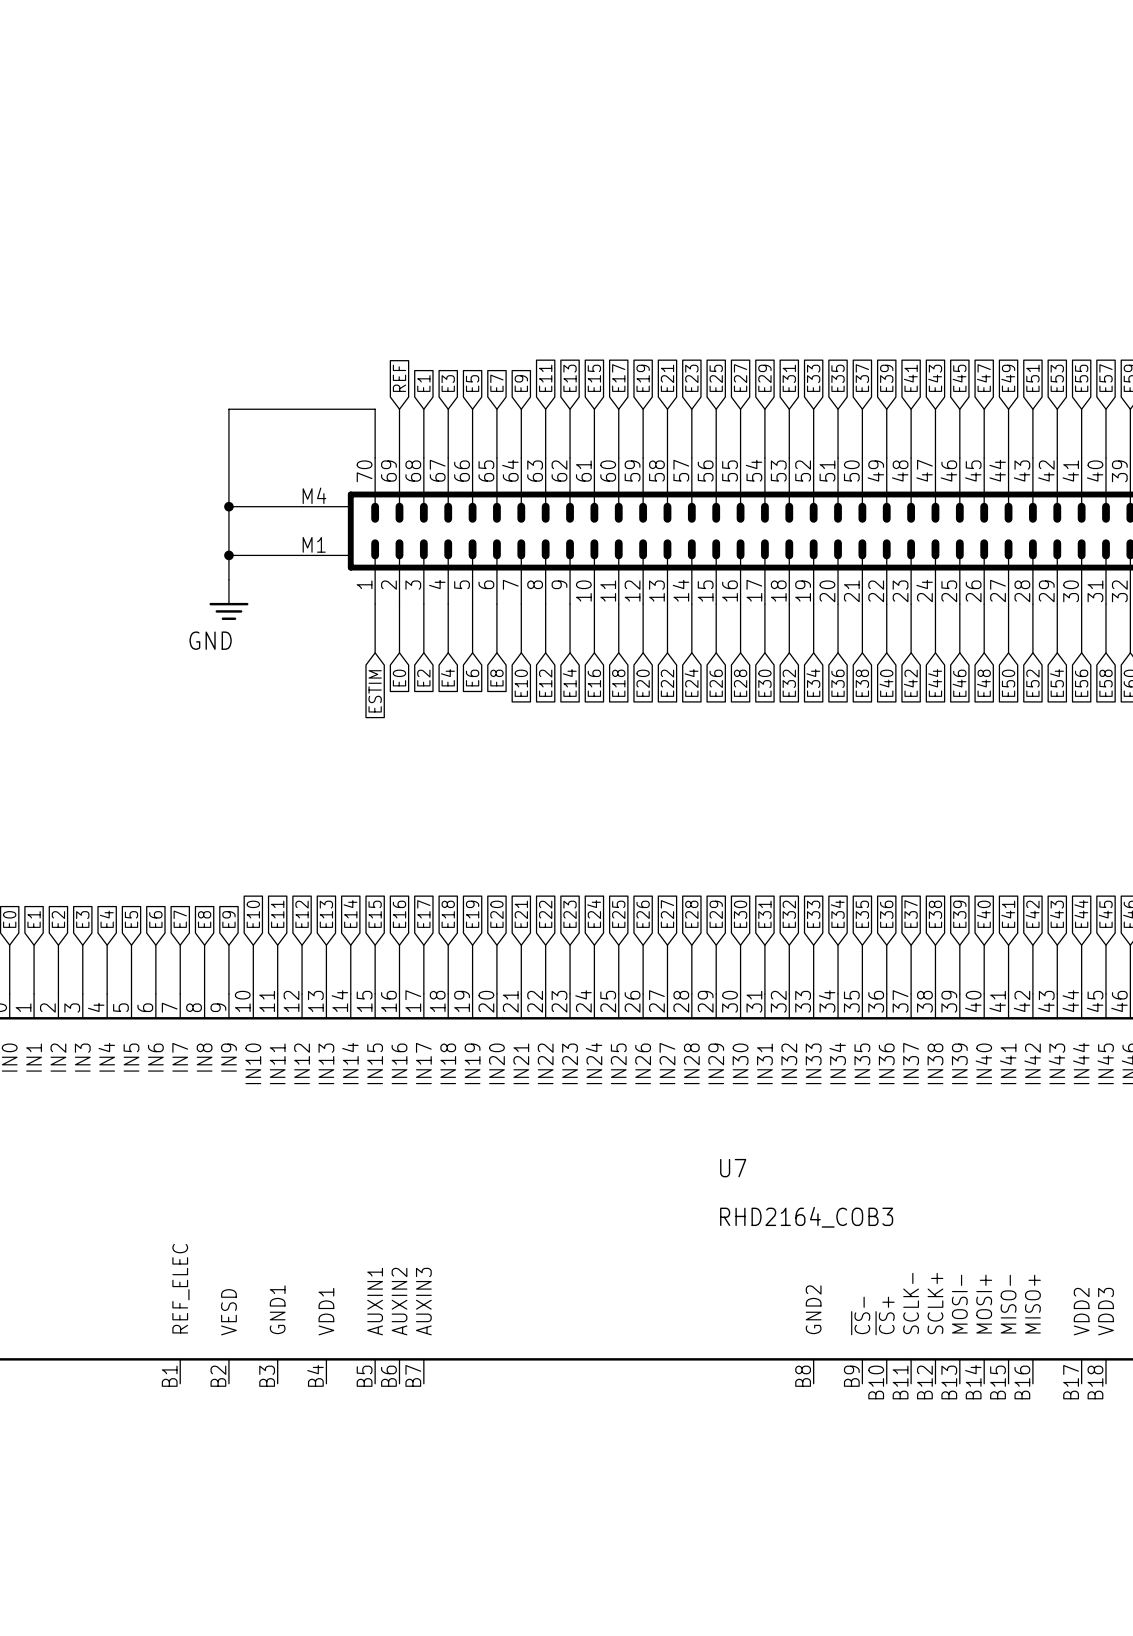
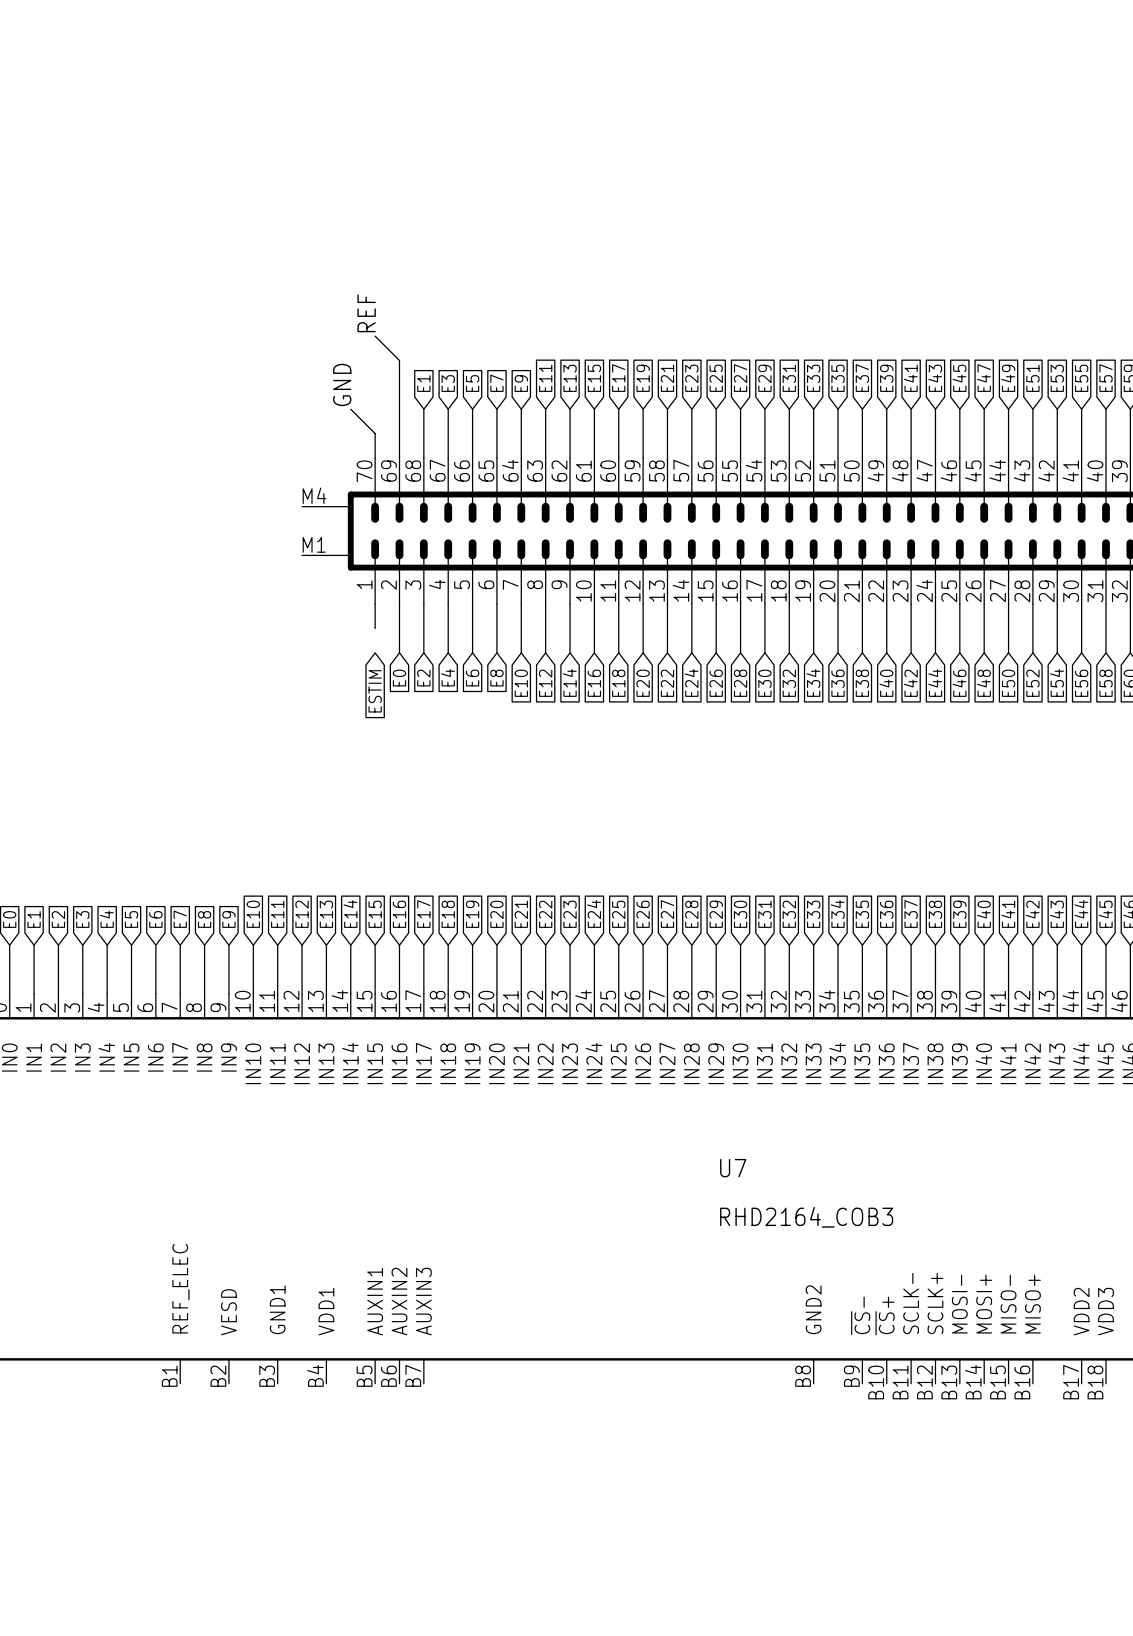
label: none -> REF (366, 313)
wire: none -> (375, 336) (399, 360) (399, 409)
global label: REF (399, 378) -> none
label: none -> GND (342, 384)
wire: (375, 433) (375, 409) (228, 409) (228, 579) -> (375, 433) (350, 409)
wire: (228, 506) (302, 506) -> none
junction: (228, 506) -> none
wire: (228, 555) (302, 555) -> none
junction: (228, 555) -> none
power symbol: GND (228, 599) -> none
wire: (375, 628) (375, 652) -> none

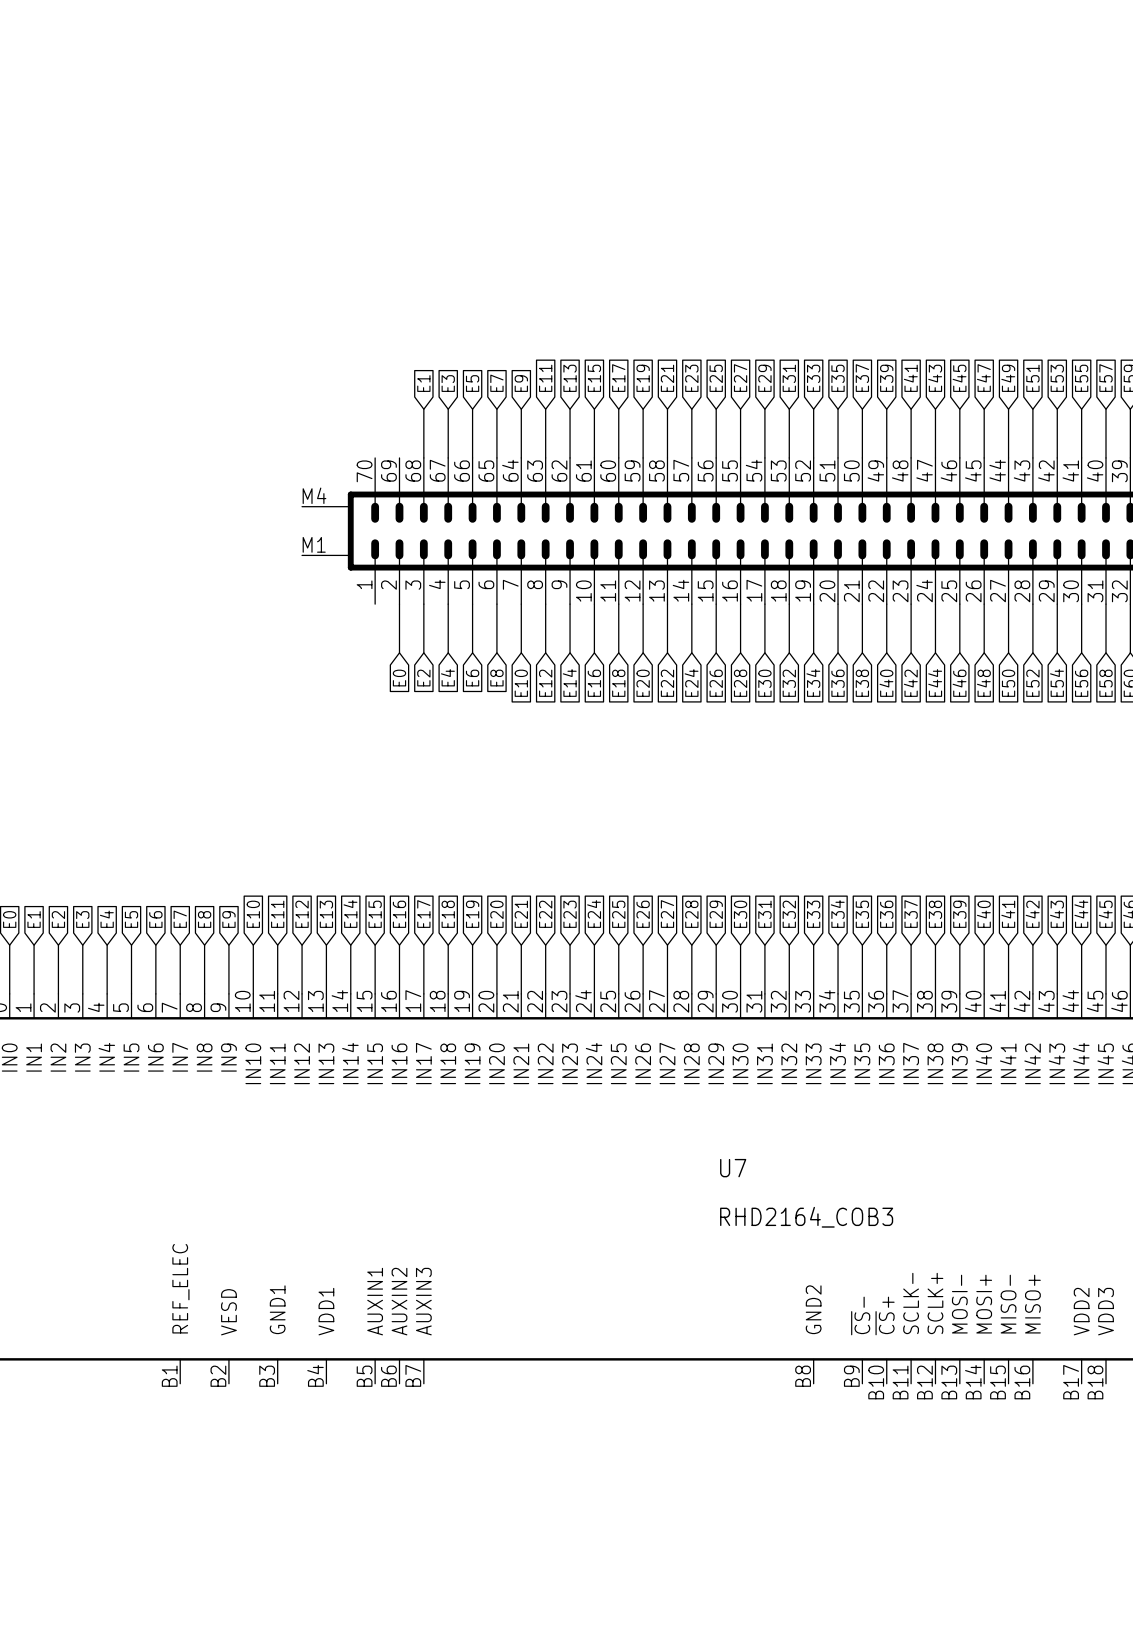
label: REF (366, 313) -> none
wire: (375, 336) (399, 360) (399, 457) -> none
label: GND (342, 384) -> none
wire: (350, 409) (375, 433) (375, 457) -> none
wire: (375, 604) (375, 628) -> none
global label: ESTIM (375, 691) -> none

